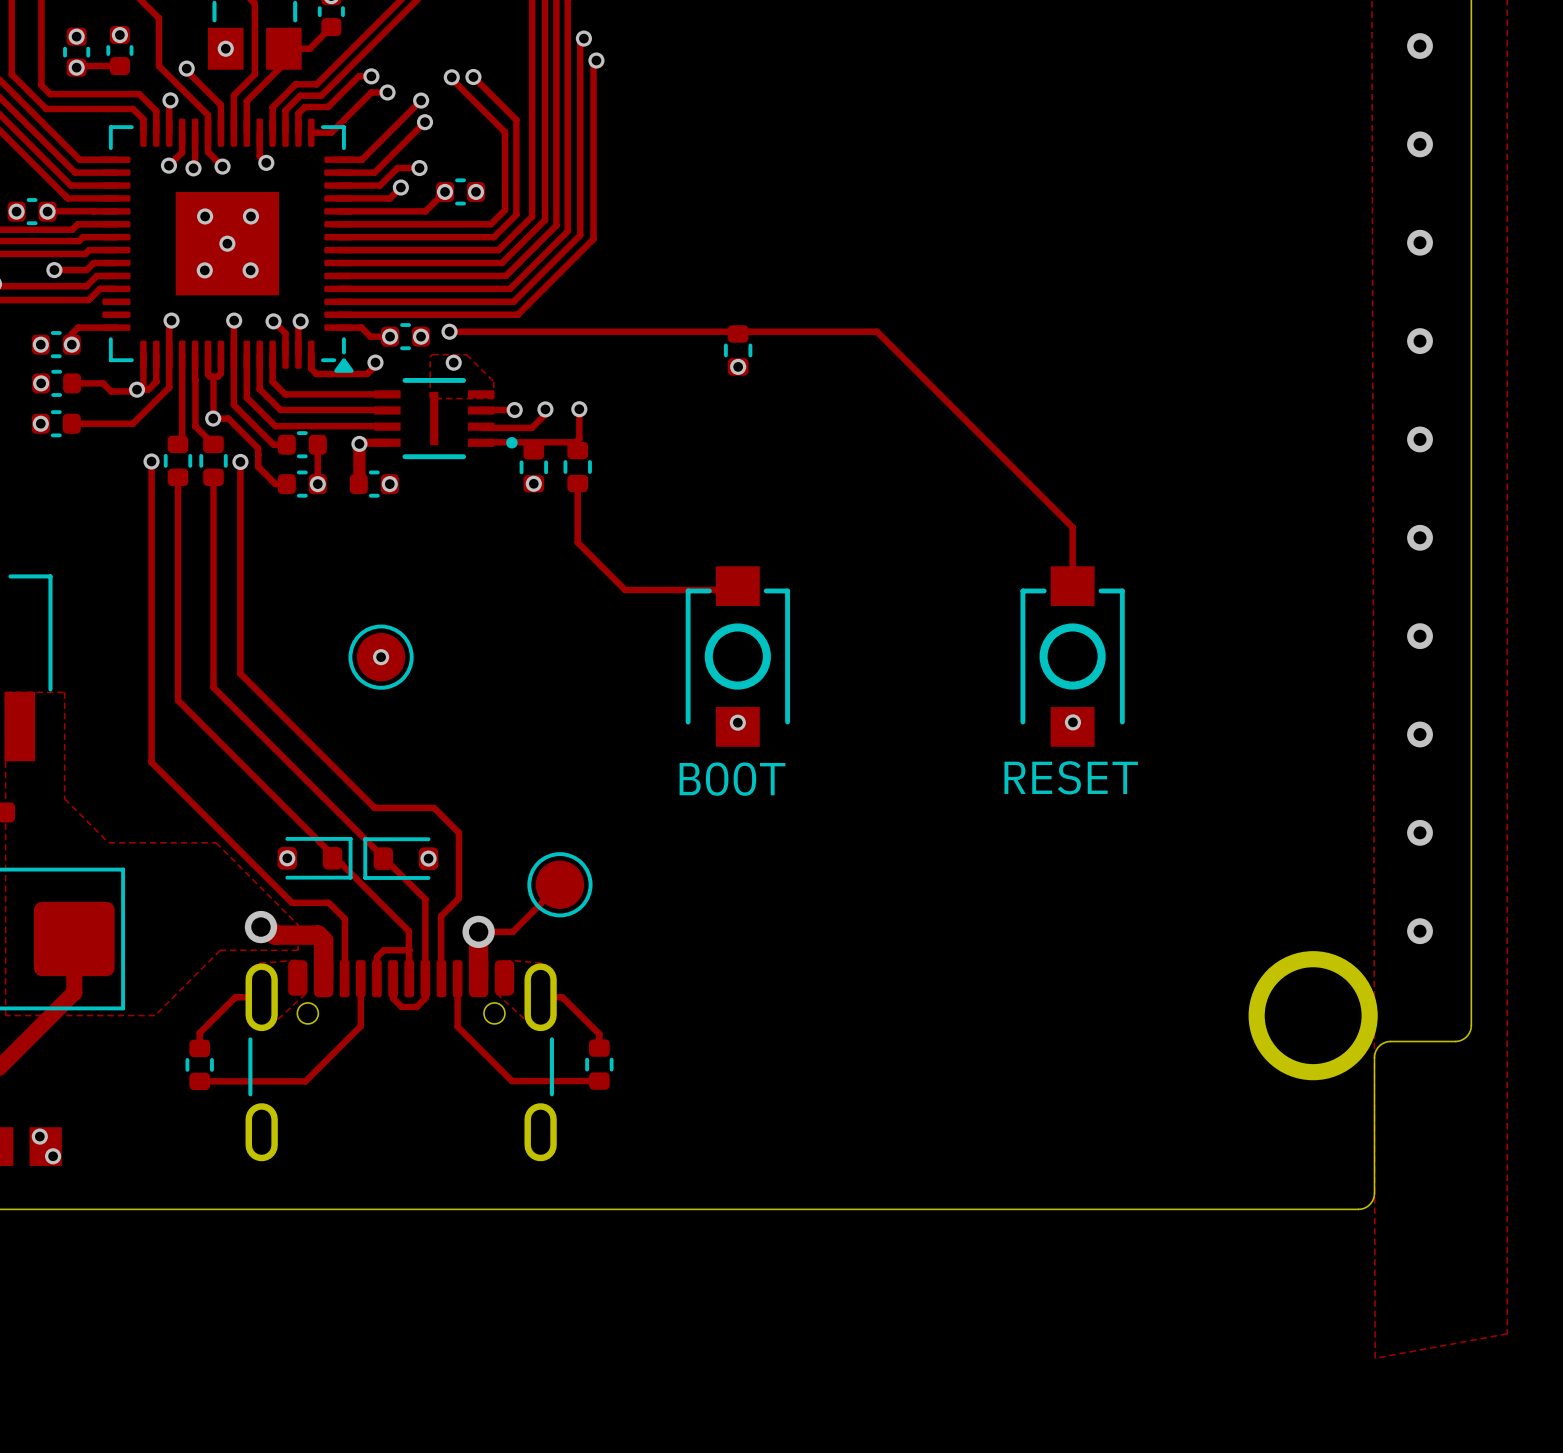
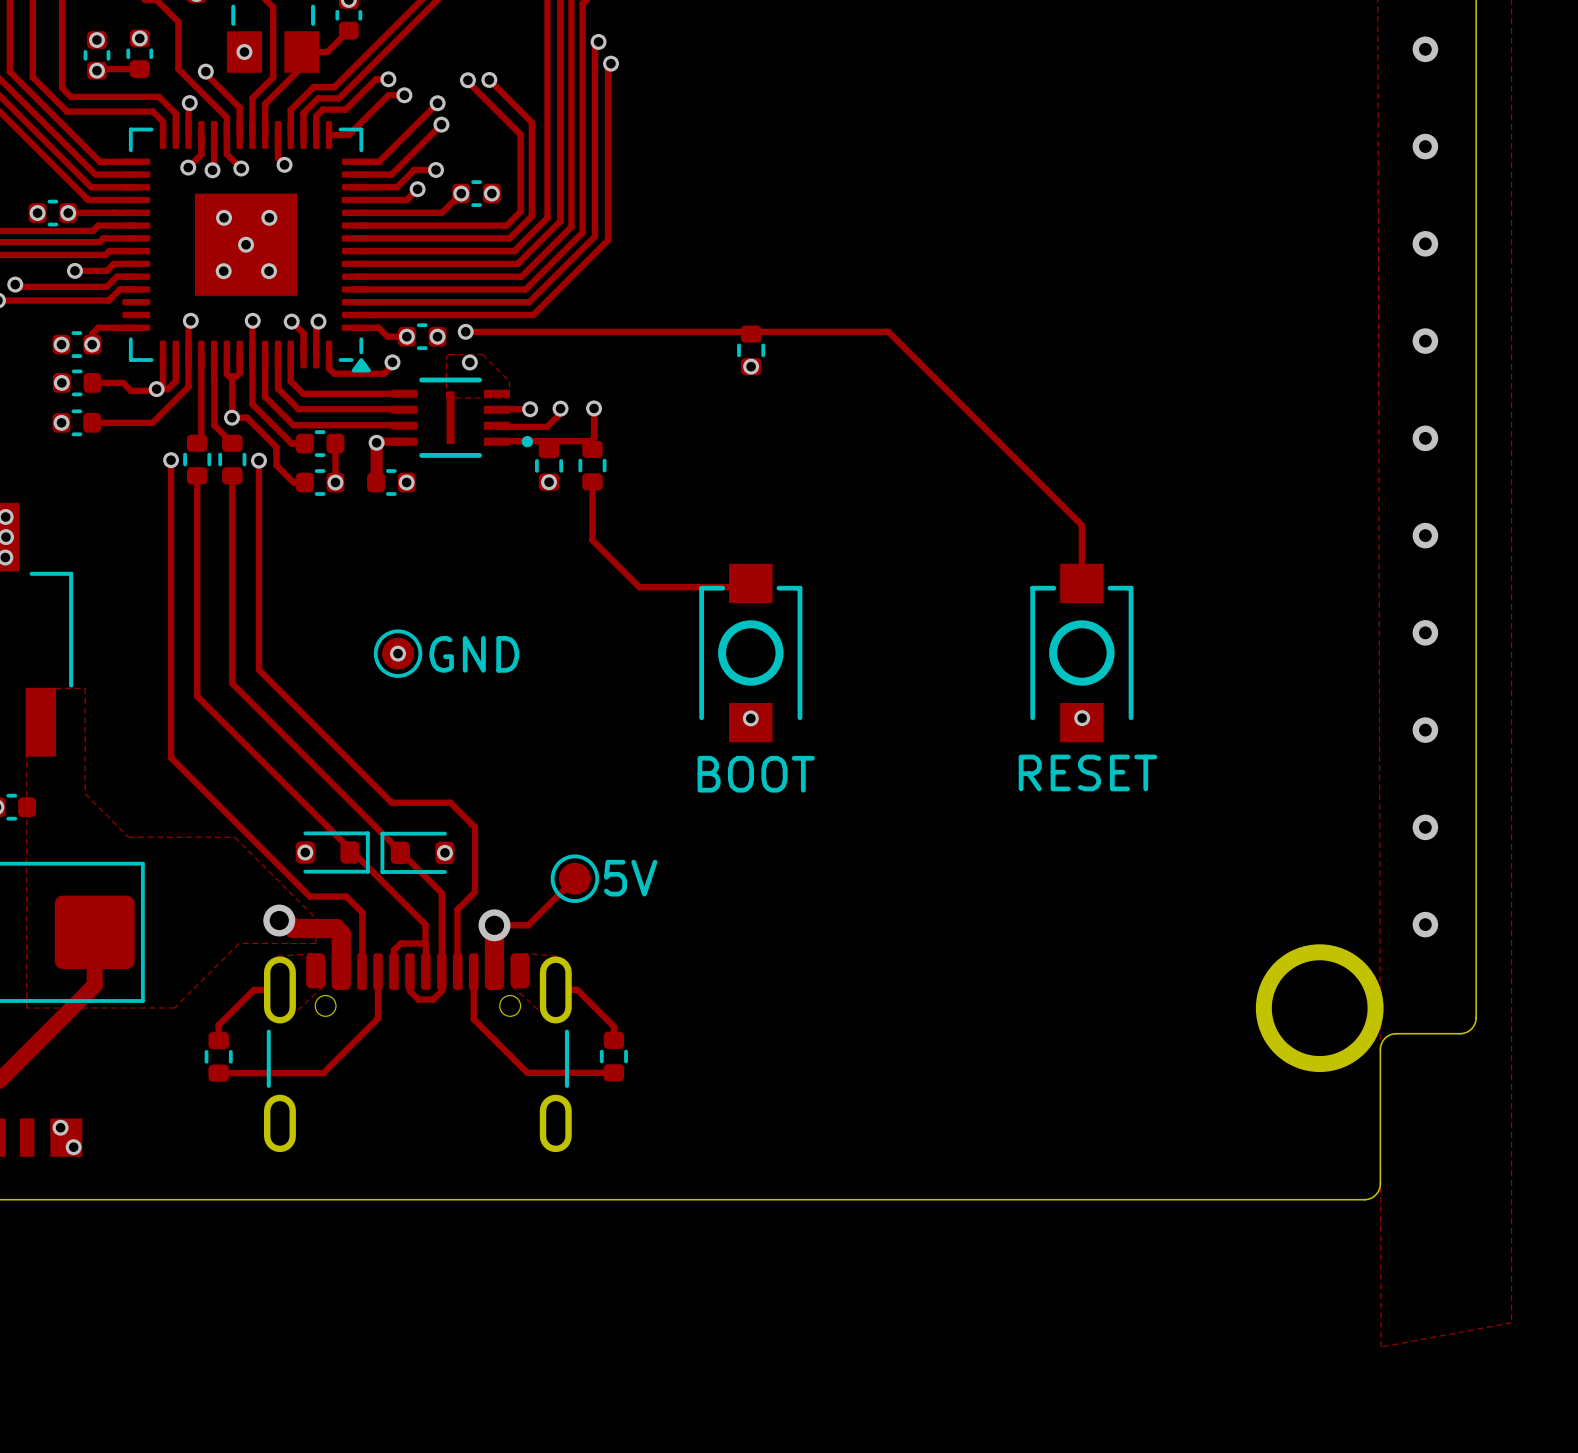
part footprint: [348, 624, 414, 690] -> [373, 629, 423, 678]
part value: none -> GND (474, 654)
part footprint: [527, 852, 593, 918] -> [550, 854, 600, 903]
part value: none -> 5V (630, 878)

